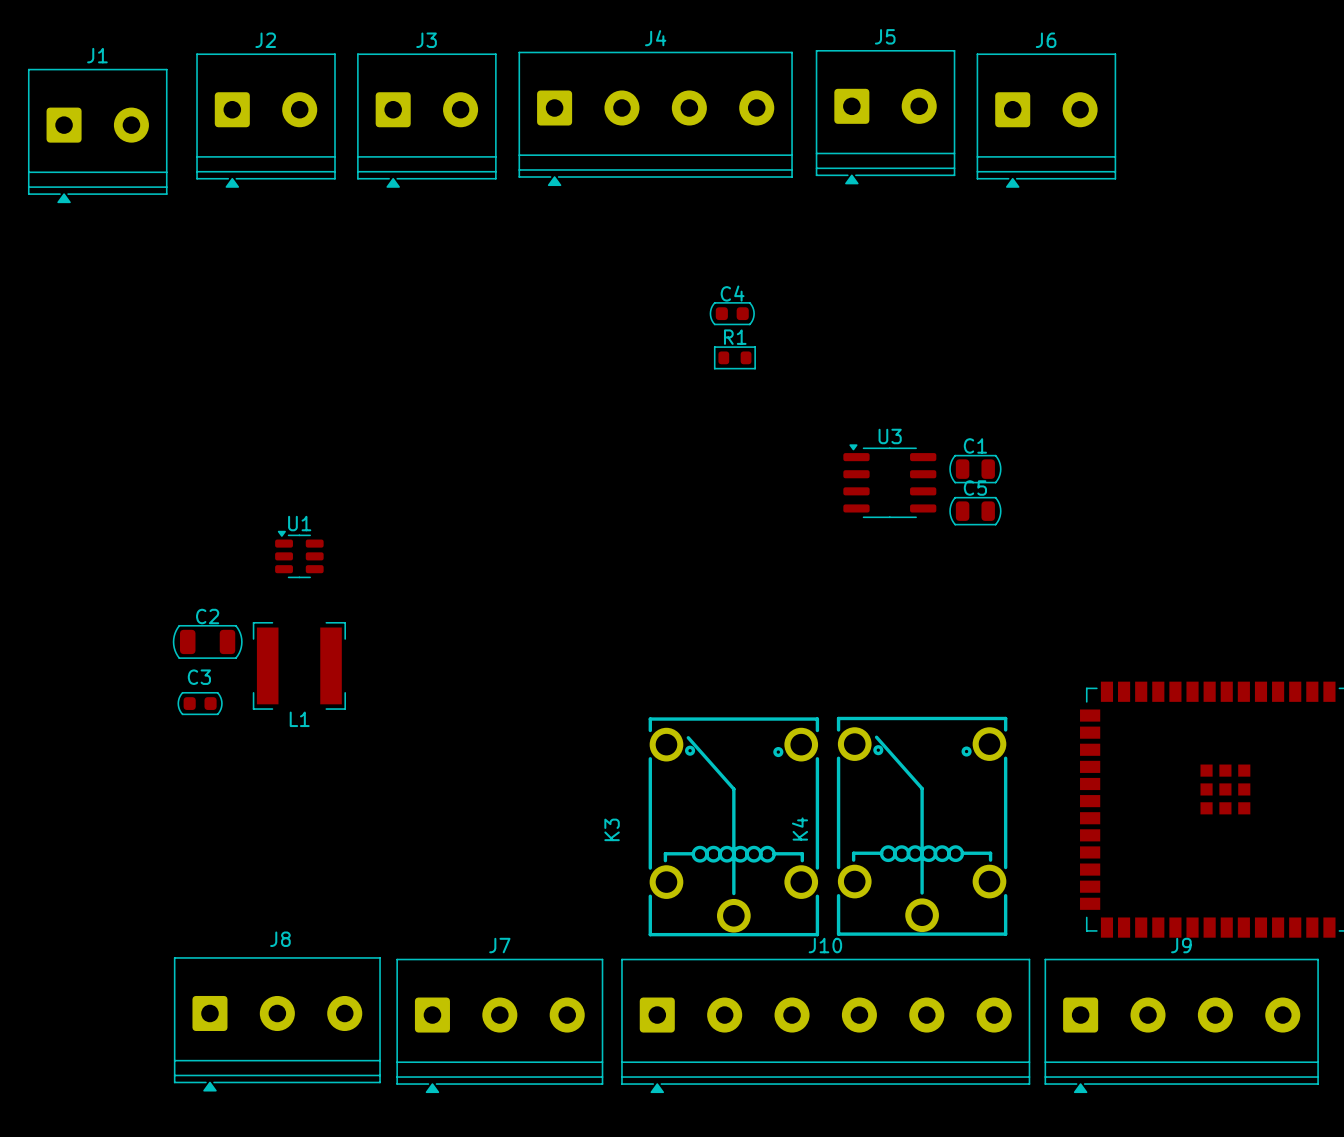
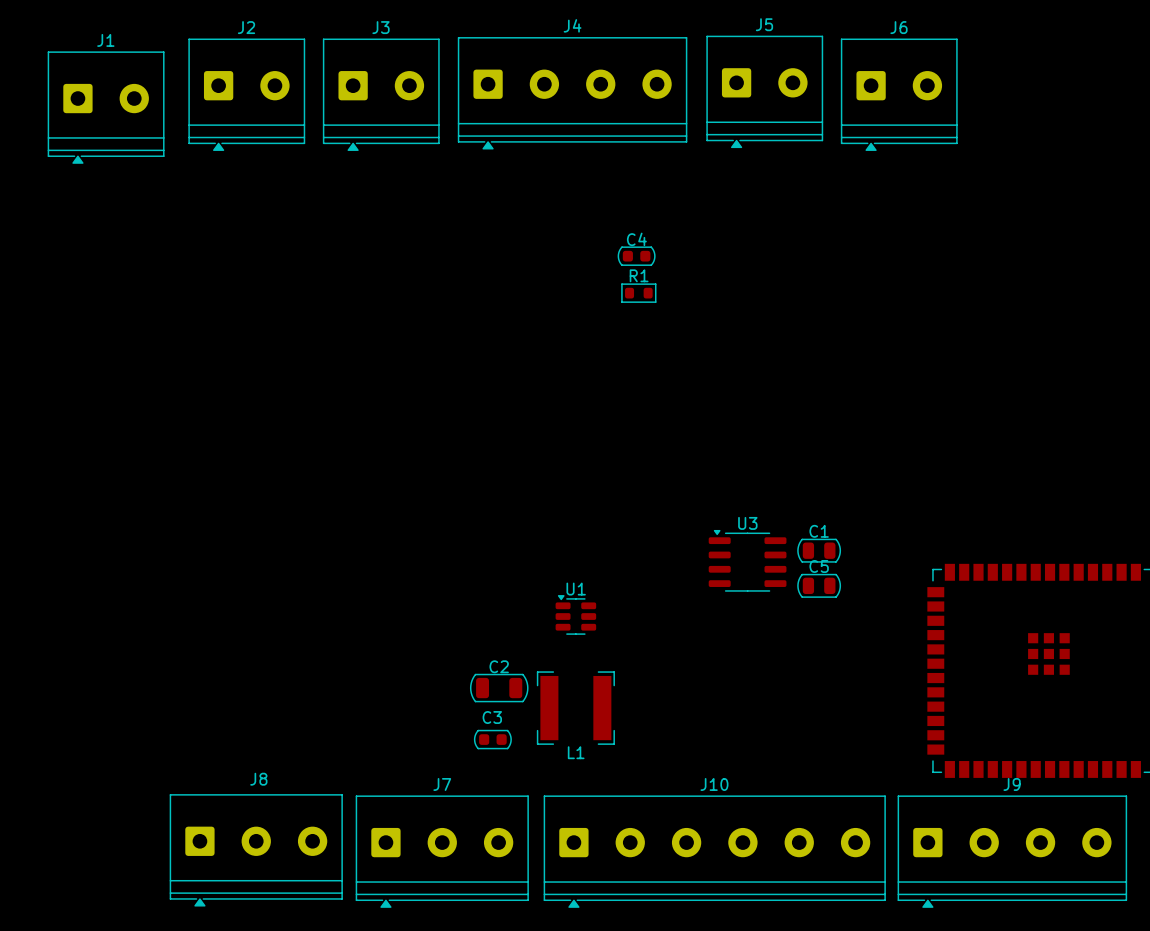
C1 position: (975, 469) -> (819, 550)
U3 position: (889, 481) -> (747, 560)
C5 position: (975, 511) -> (819, 585)
U1 position: (299, 554) -> (575, 614)
C2 position: (207, 641) -> (499, 688)
L1 position: (299, 665) -> (575, 708)
C3 position: (200, 703) -> (492, 739)
K3: (733, 826) -> none
K4: (922, 826) -> none

